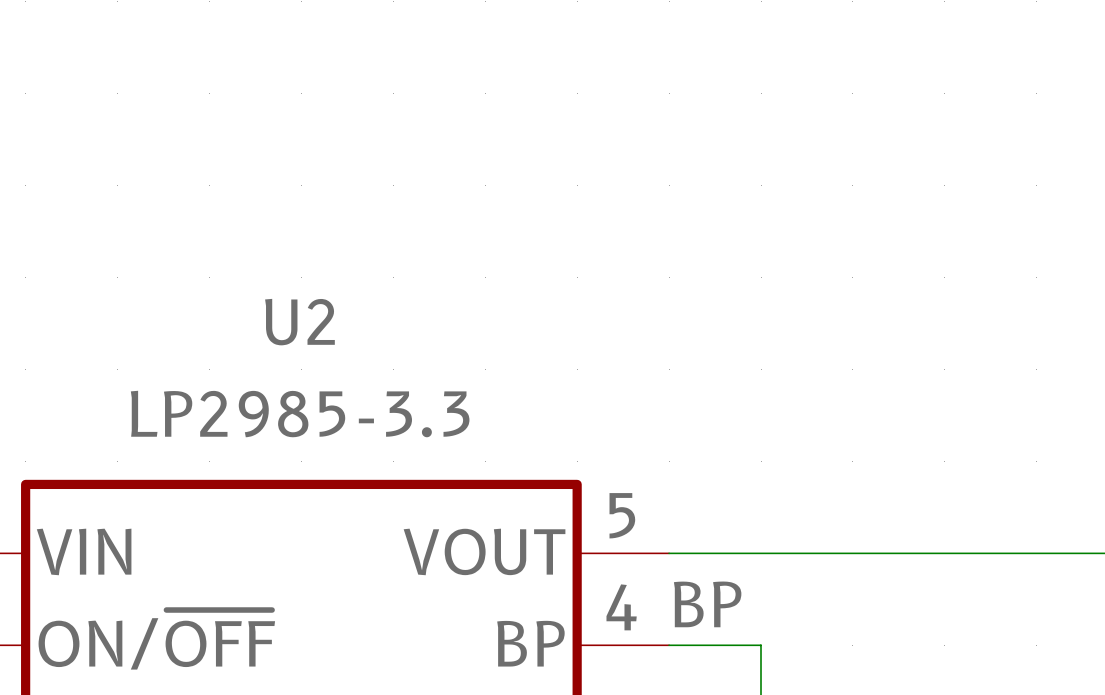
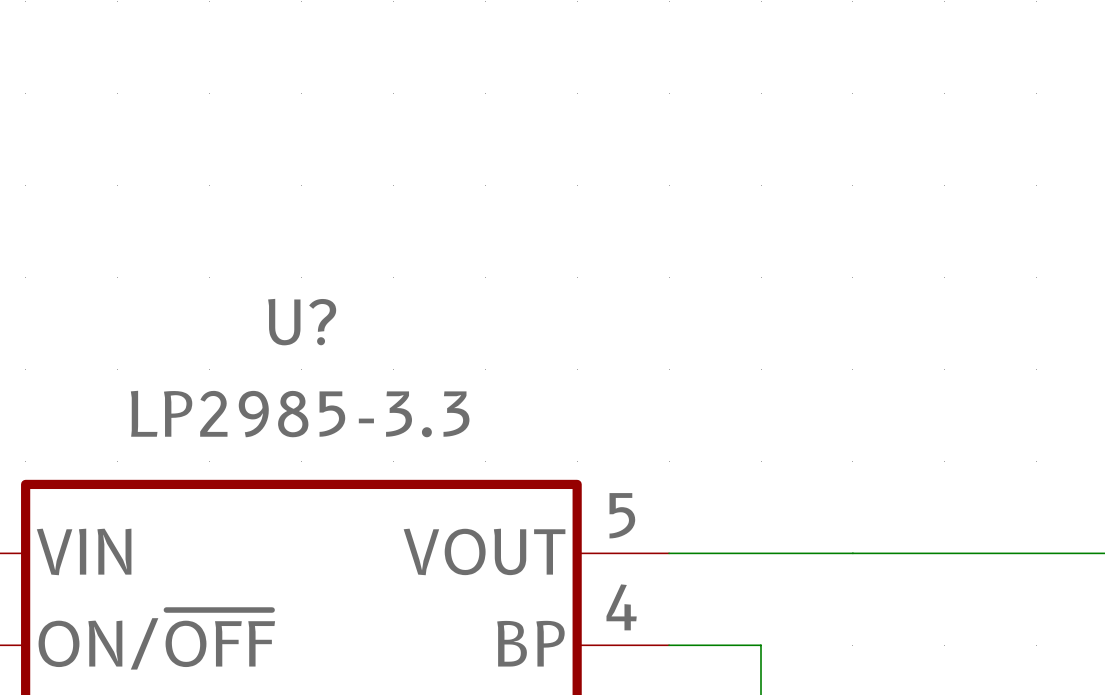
U2 name: U2 (299, 322) -> U? (302, 322)
label: BP (707, 604) -> none

